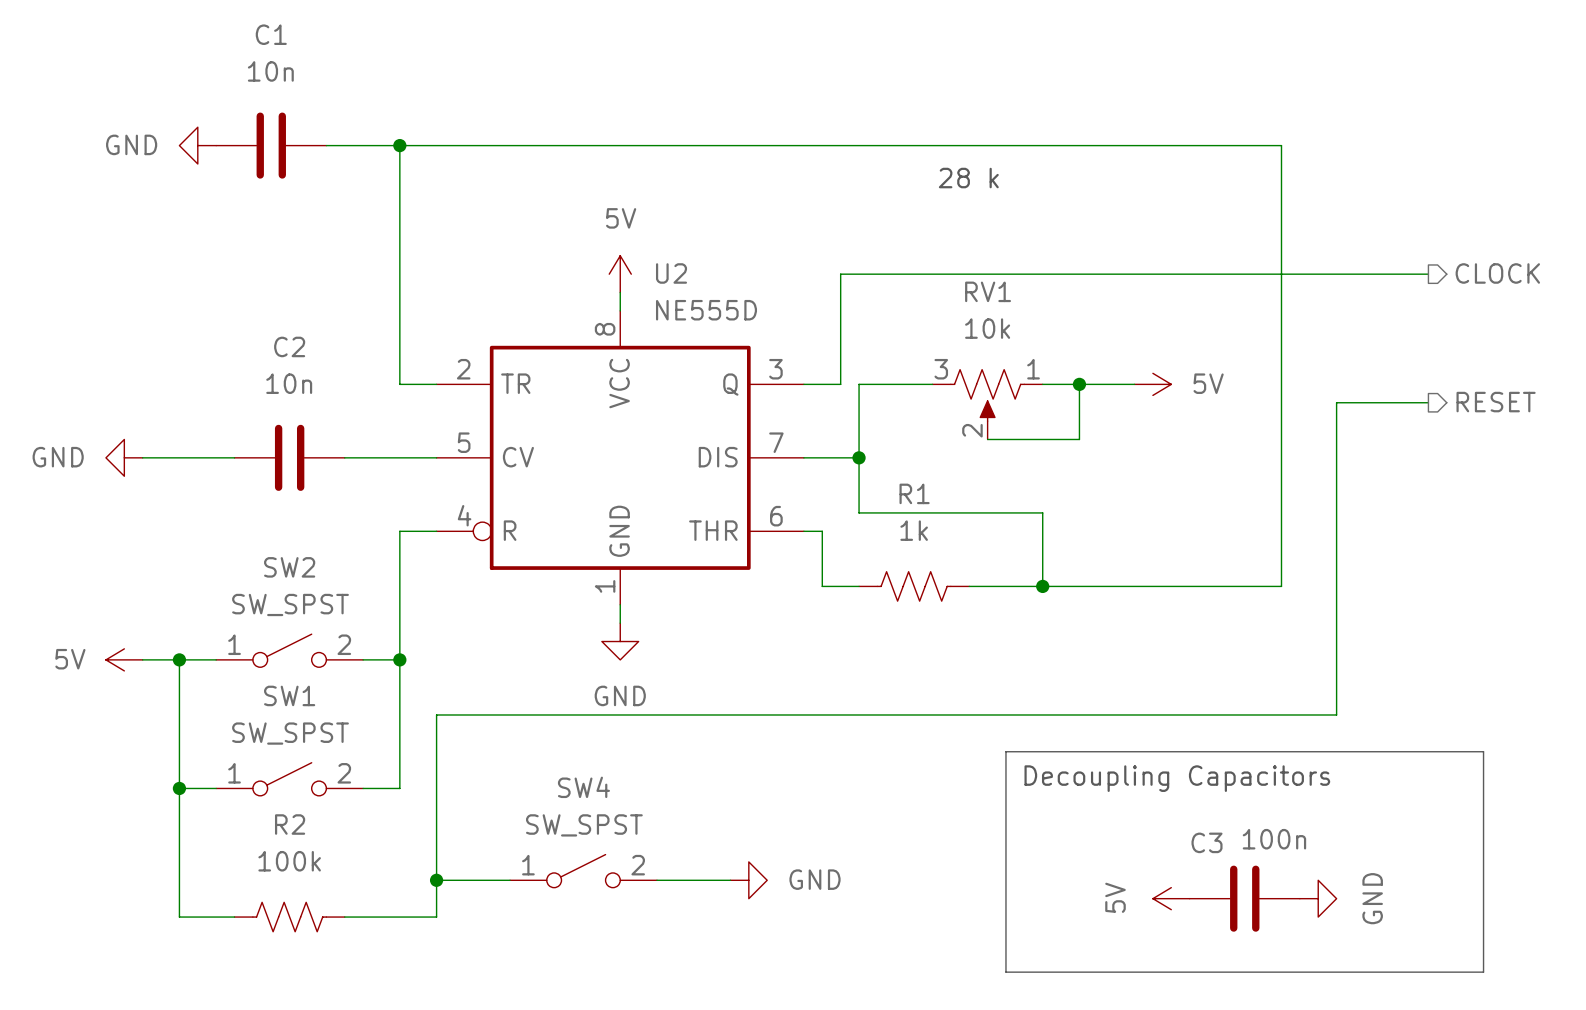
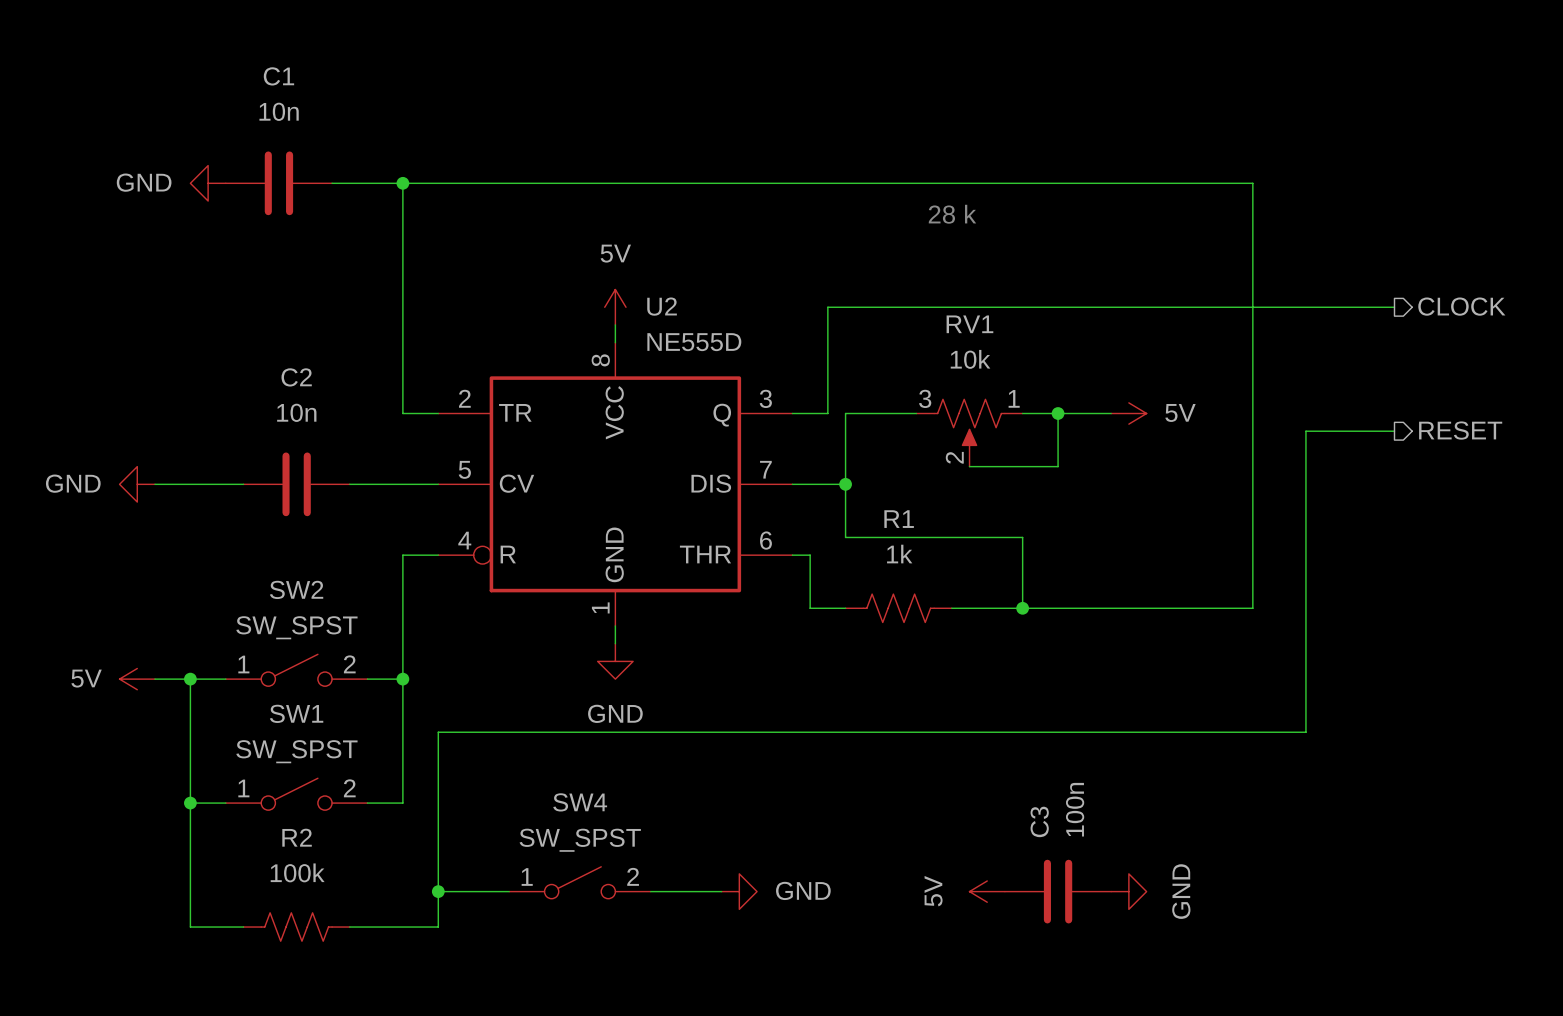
line: (1005, 751) (1483, 751) (1483, 972) (1005, 972) (1005, 751) -> none
text: Decoupling Capacitors (1177, 778) -> none
C3 value rotation: 0° (1274, 839) -> 90° counterclockwise (1075, 809)
C3 name rotation: 0° (1207, 842) -> 90° counterclockwise (1039, 821)
power symbol position: 5V (1171, 898) -> 5V (987, 891)
C3 position: (1244, 898) -> (1058, 891)
power symbol position: GND (1318, 898) -> GND (1128, 891)

